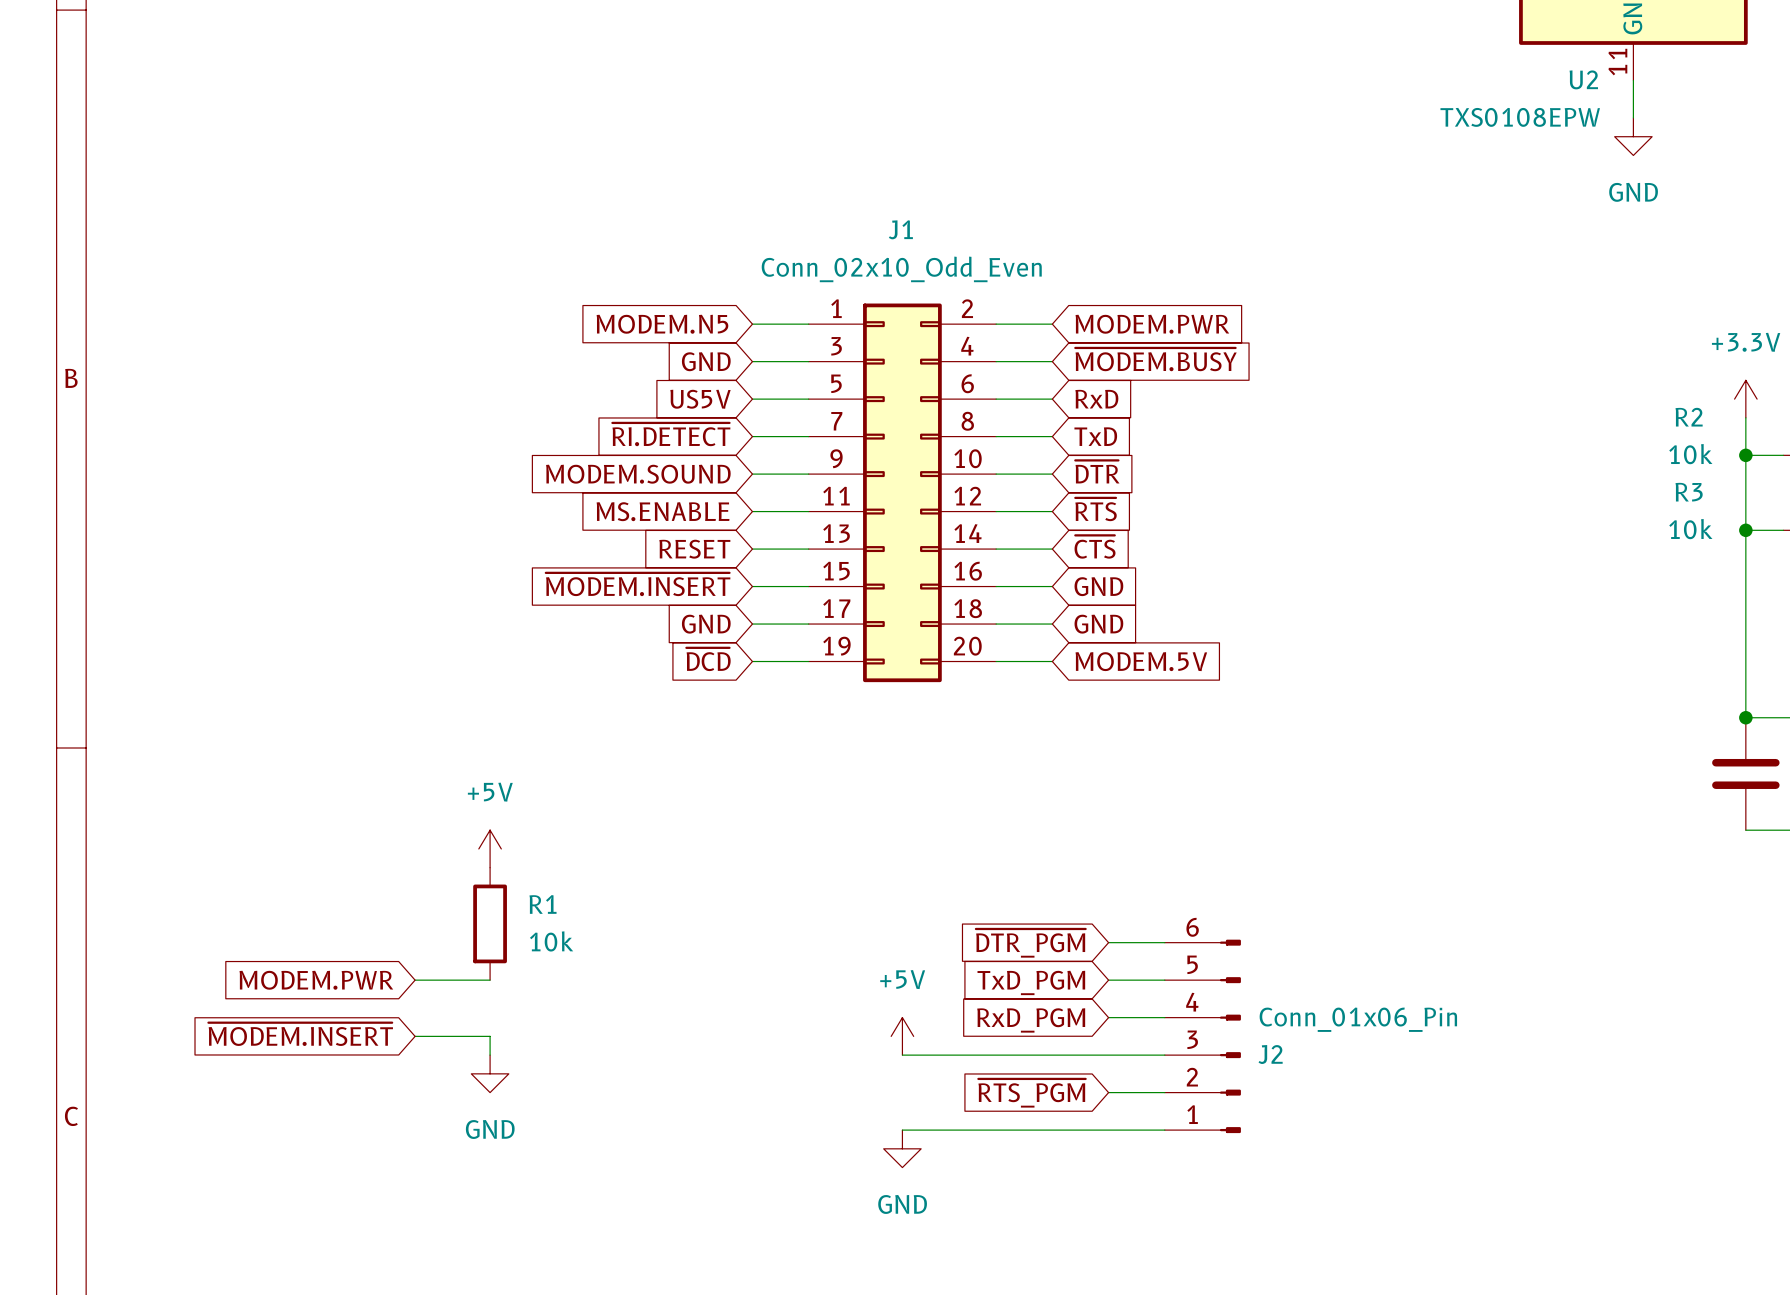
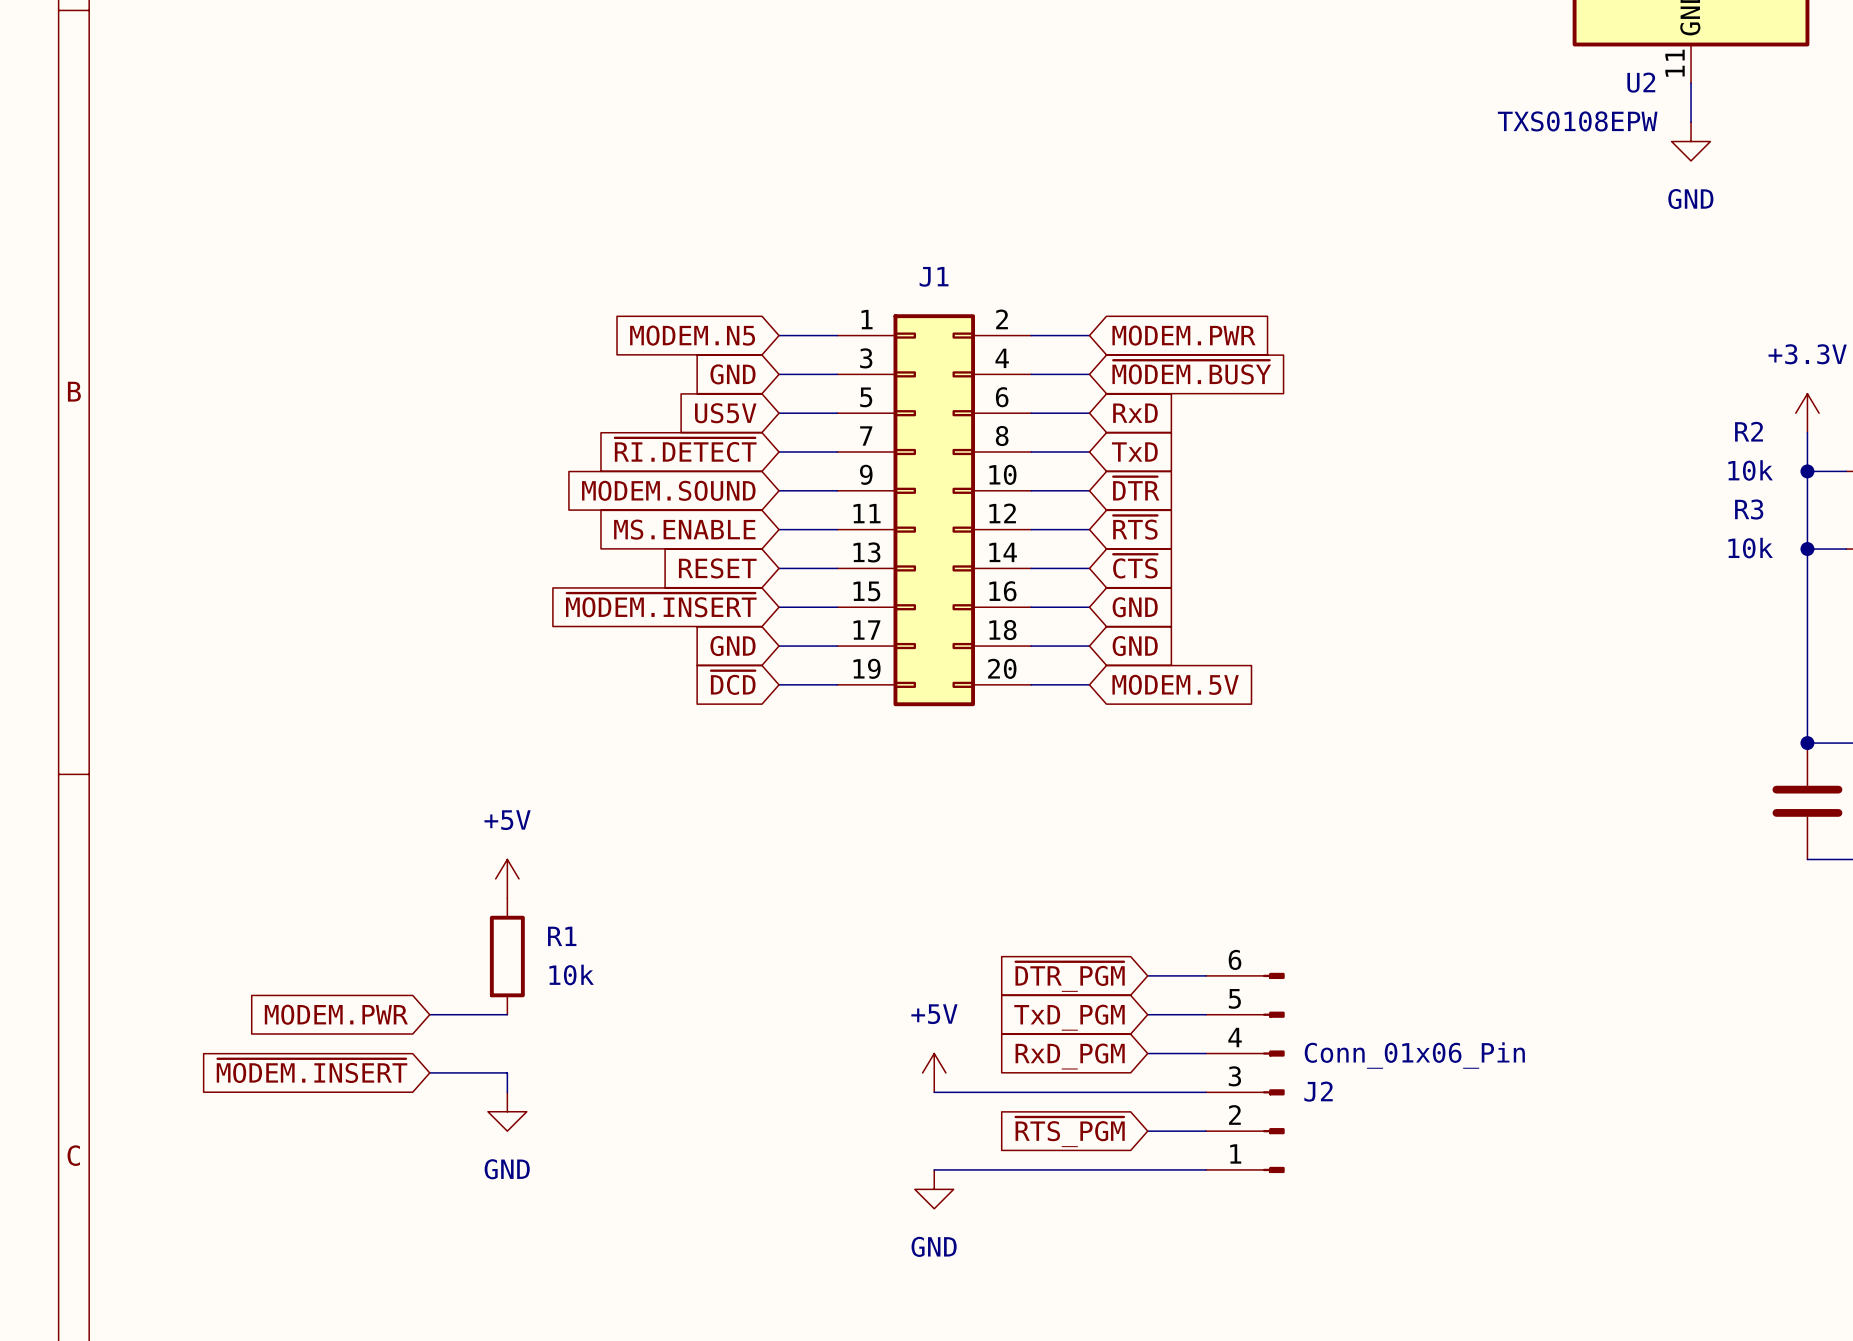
J1 name position: J1 (900, 229) -> J1 (934, 276)
J1 value: Conn_02x10_Odd_Even (901, 269) -> none

